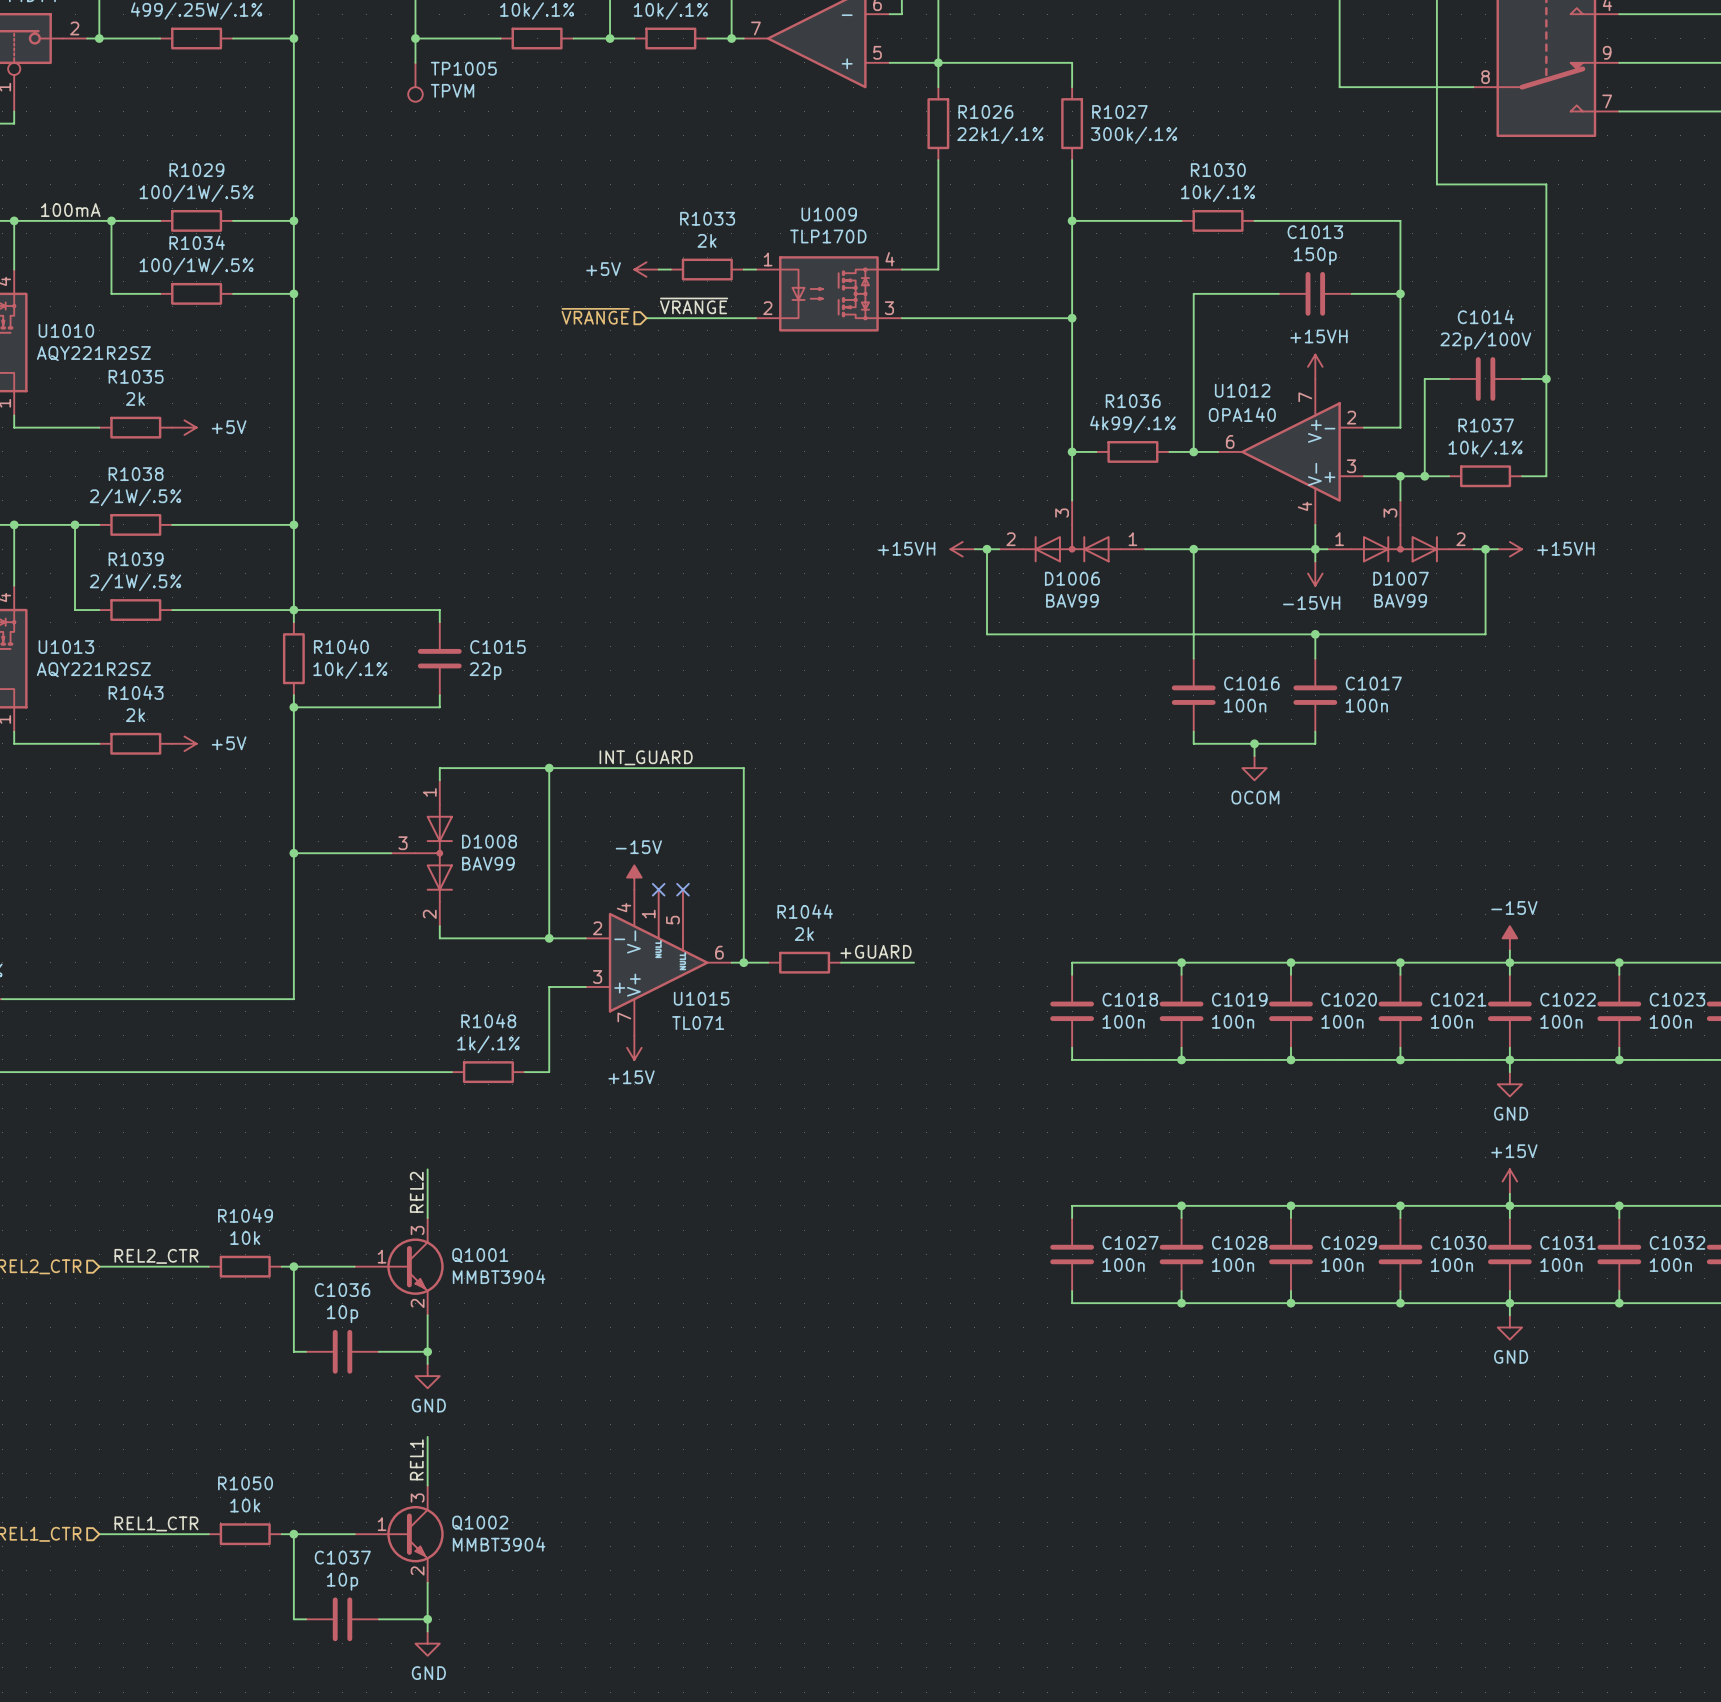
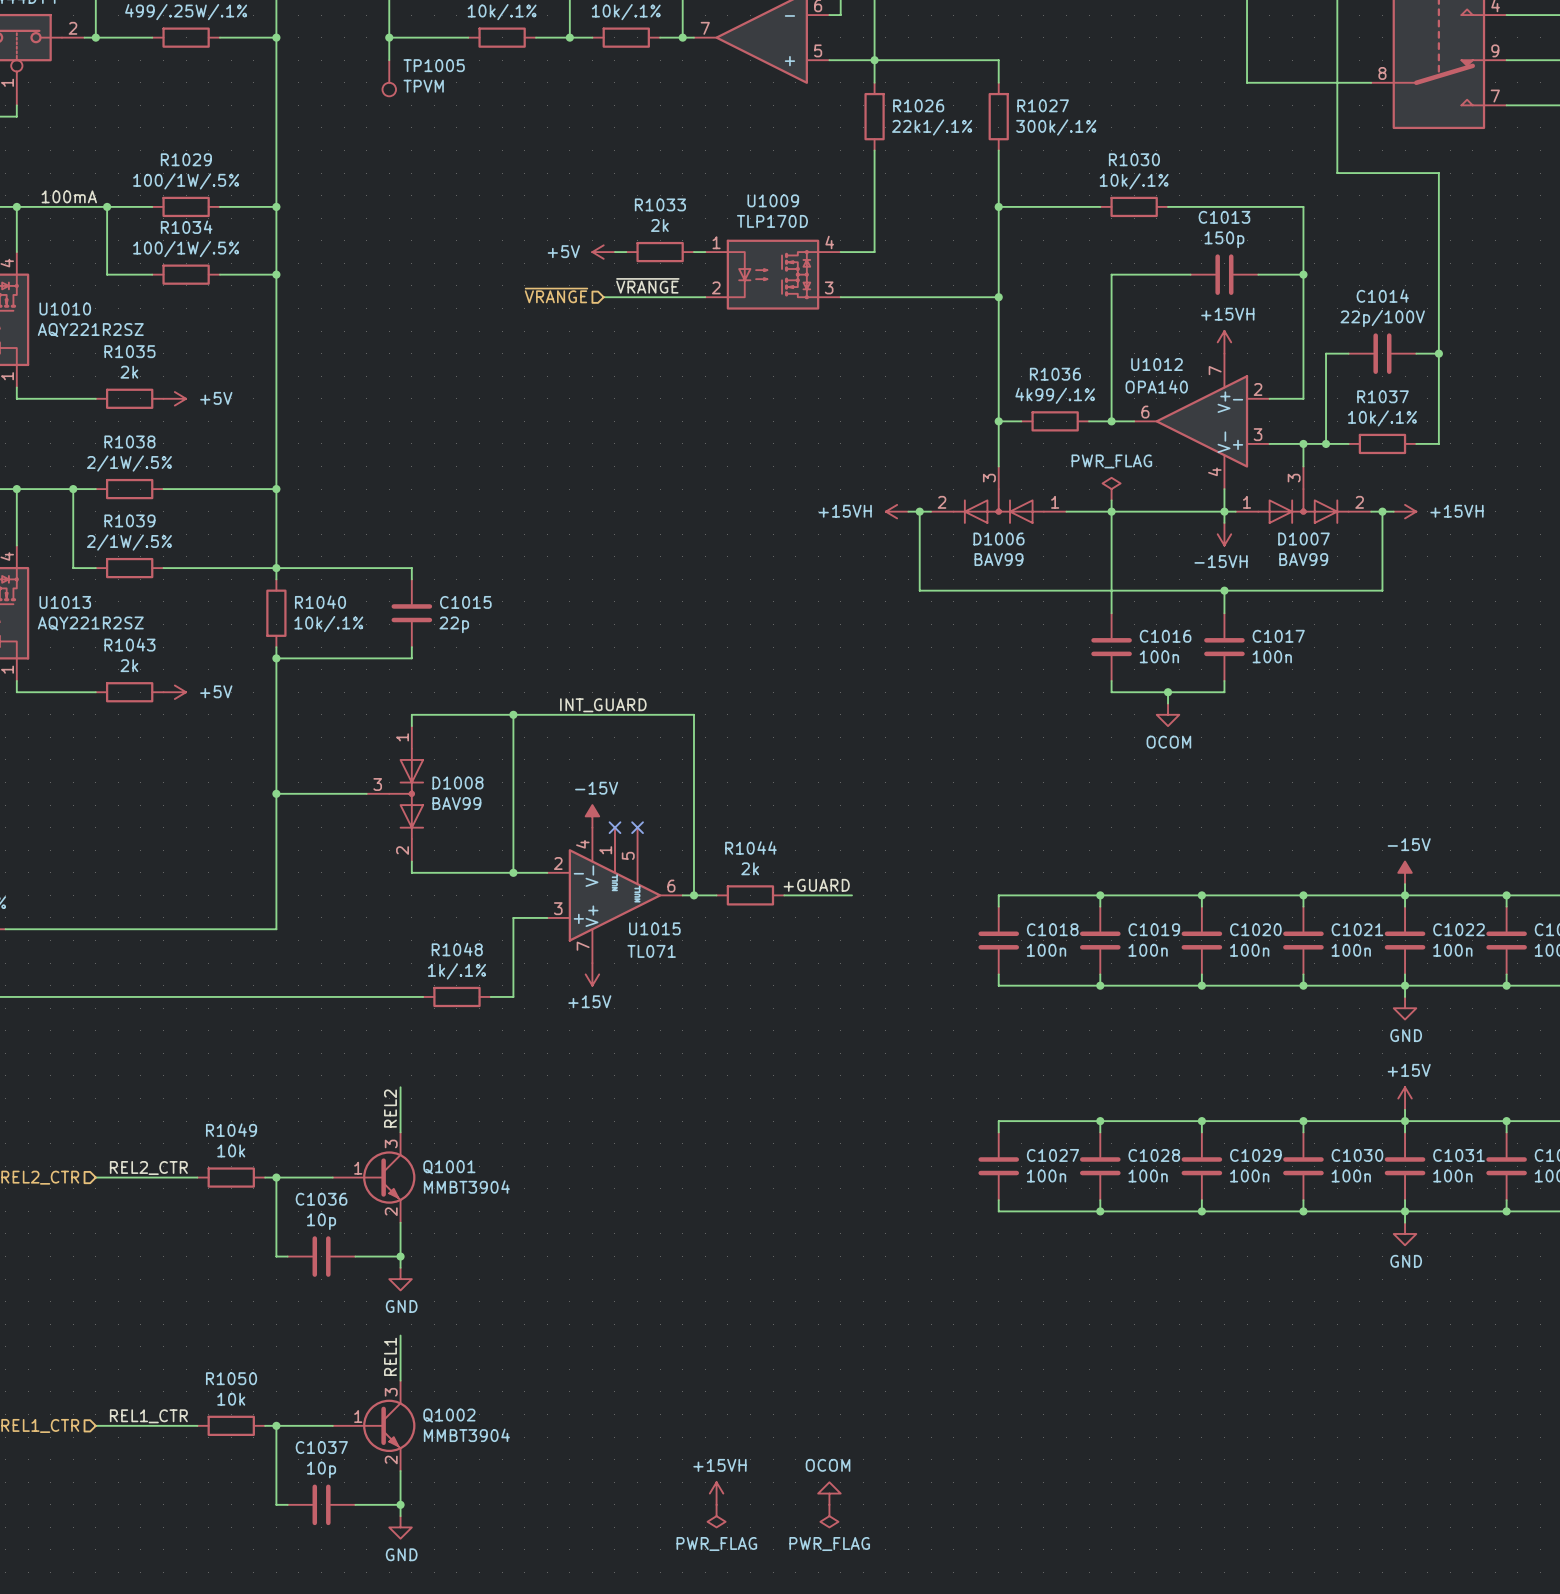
power symbol: none -> PWR_FLAG (1111, 489)
wire: none -> (1111, 500) (1111, 511)
power symbol: none -> +15VH (716, 1493)
power symbol: none -> OCOM (829, 1493)
power symbol: none -> PWR_FLAG (716, 1516)
power symbol: none -> PWR_FLAG (829, 1516)

